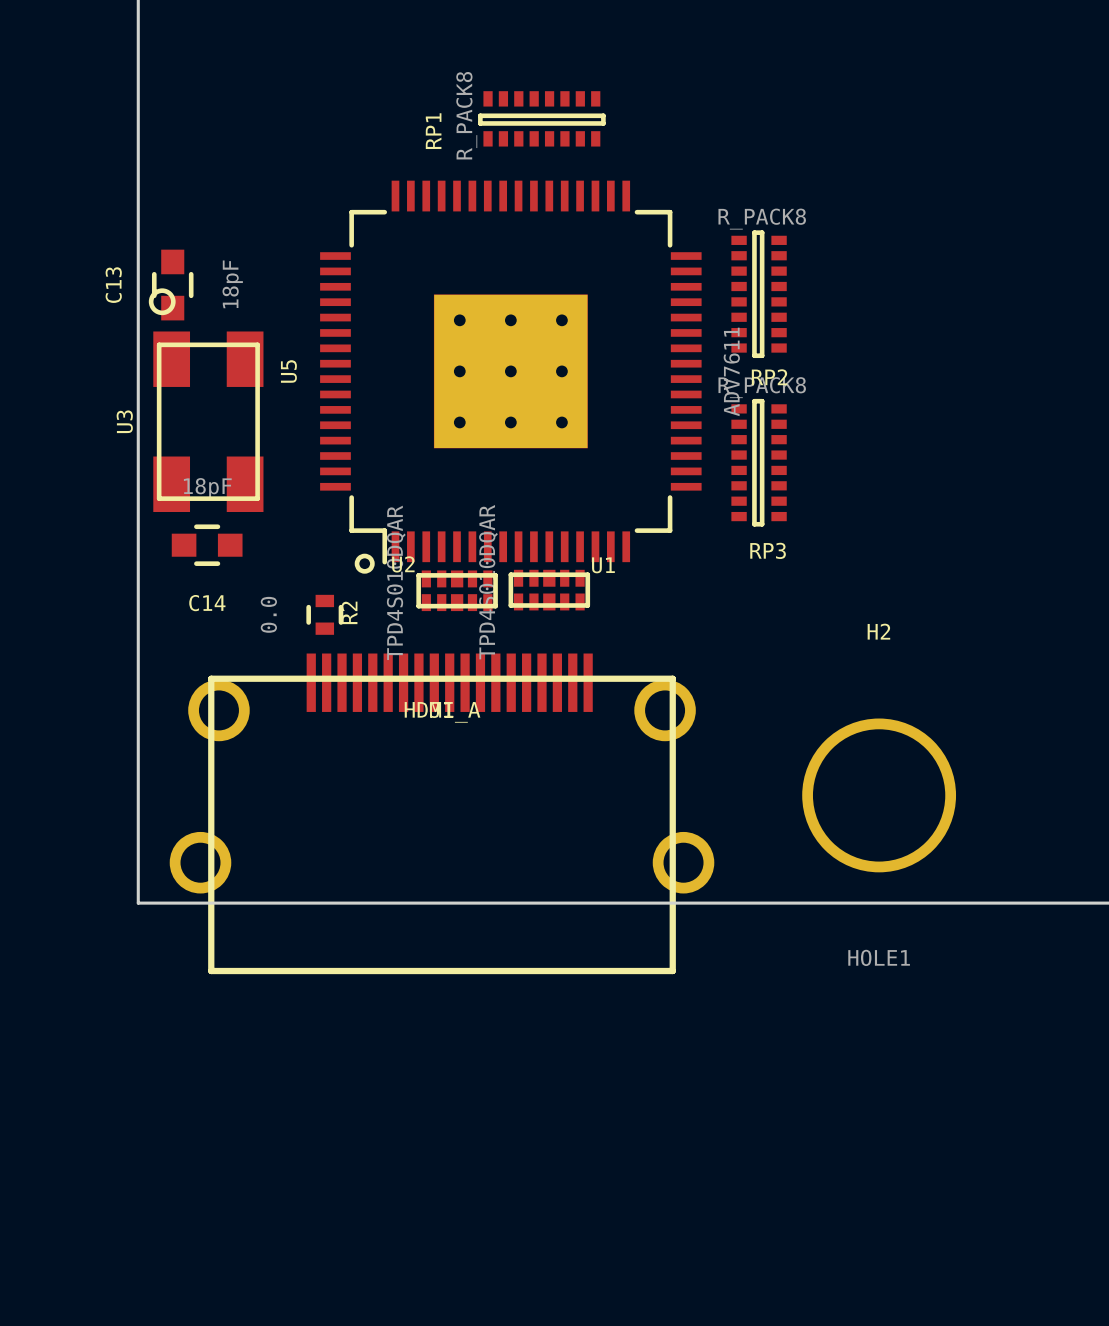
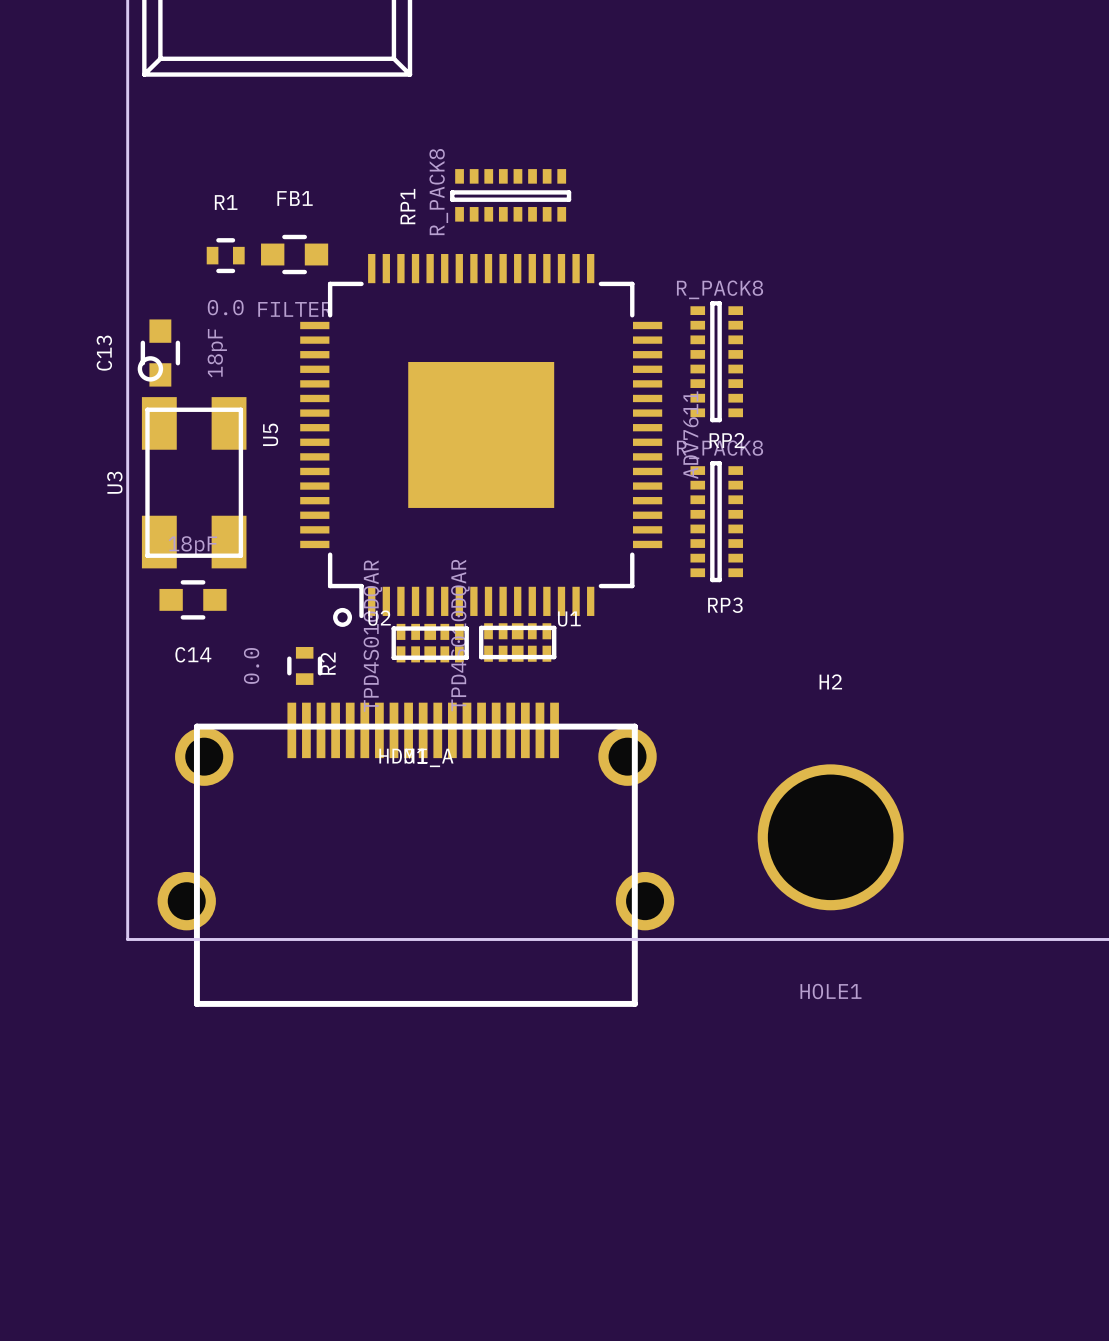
U5 footprint: [320, 180, 702, 574] -> [300, 253, 663, 627]
FB1: none -> FILTER (294, 254)
R1: none -> 0.0 (225, 255)

